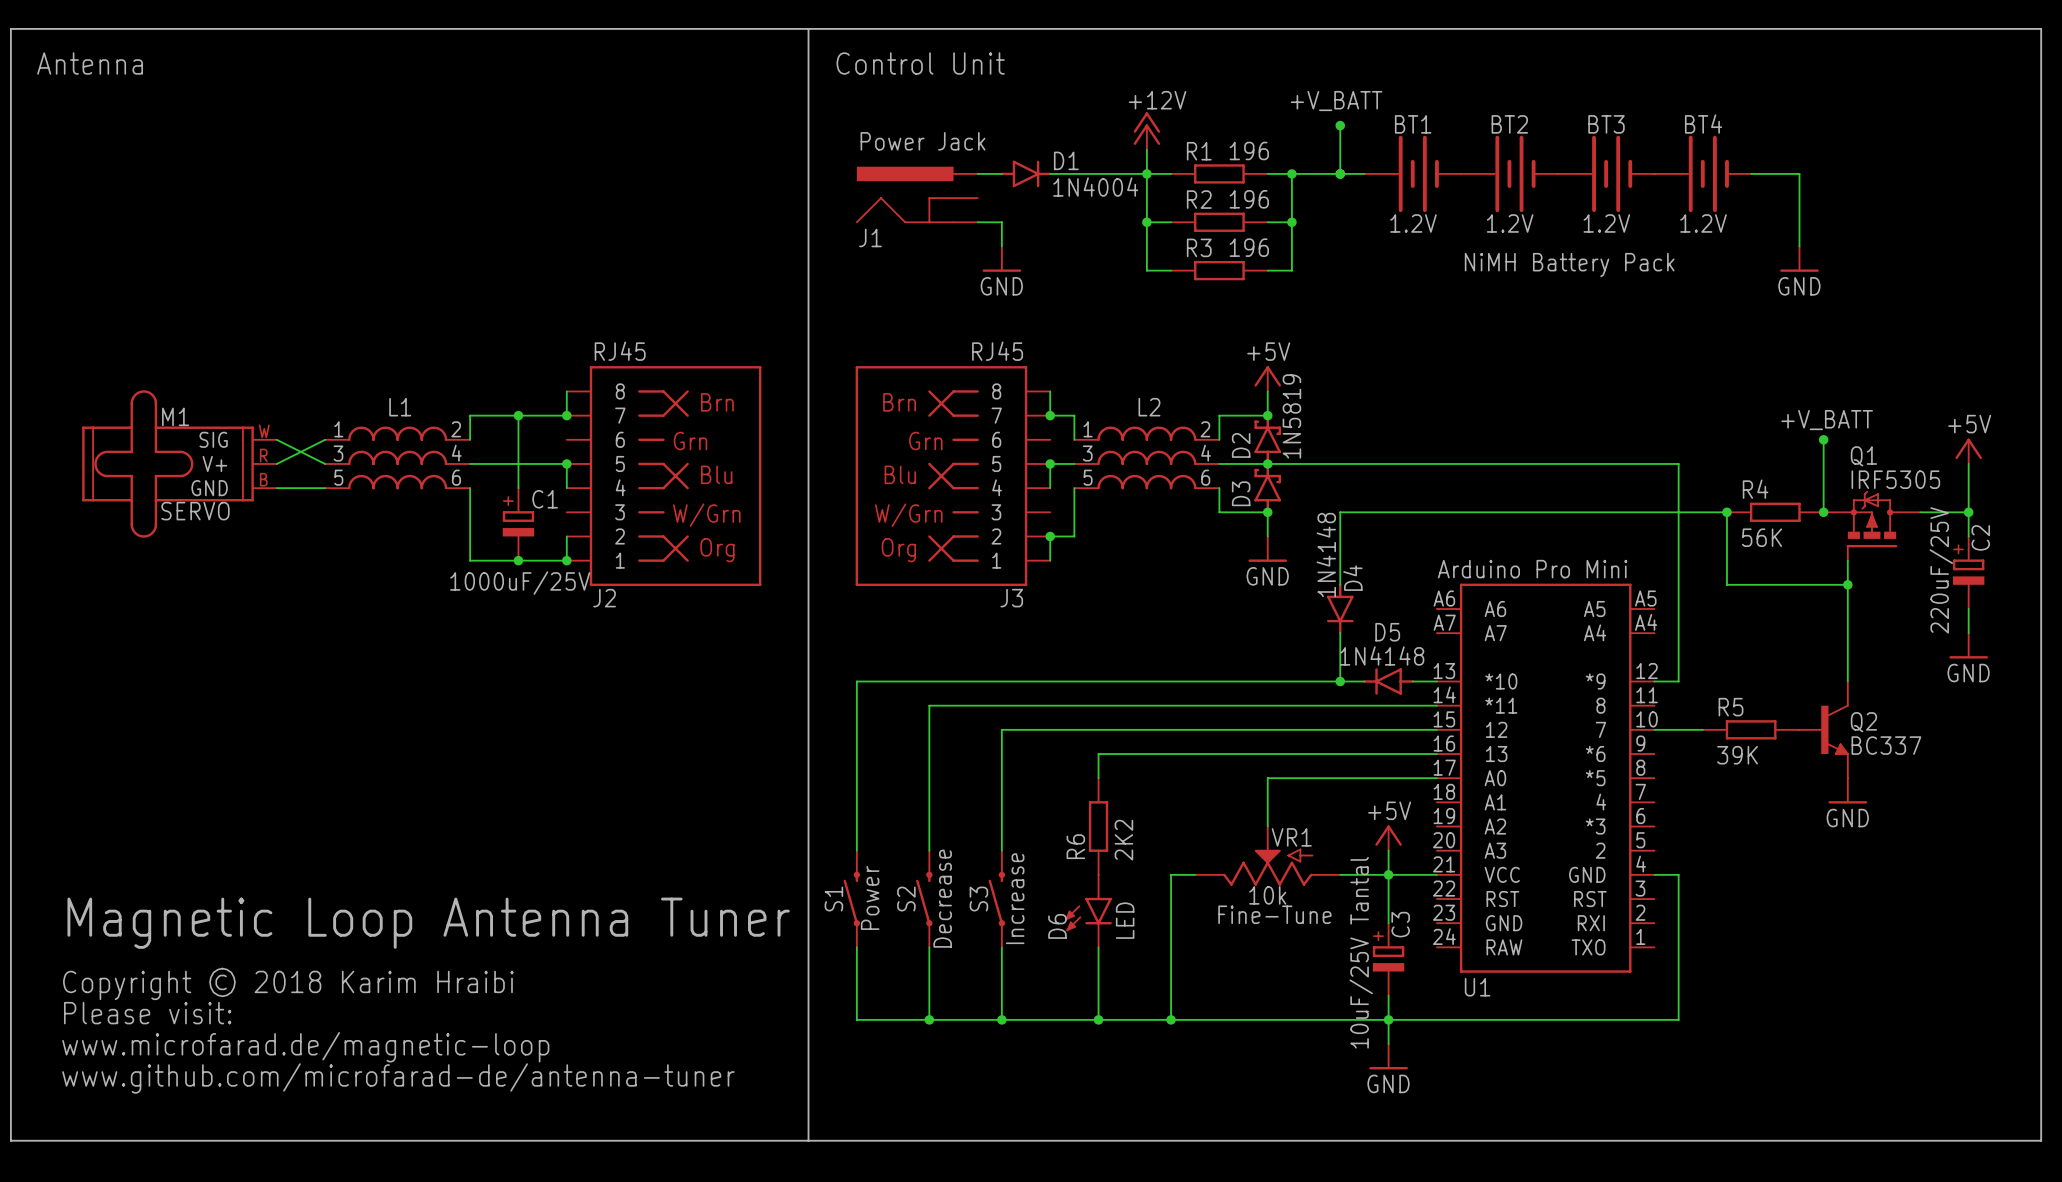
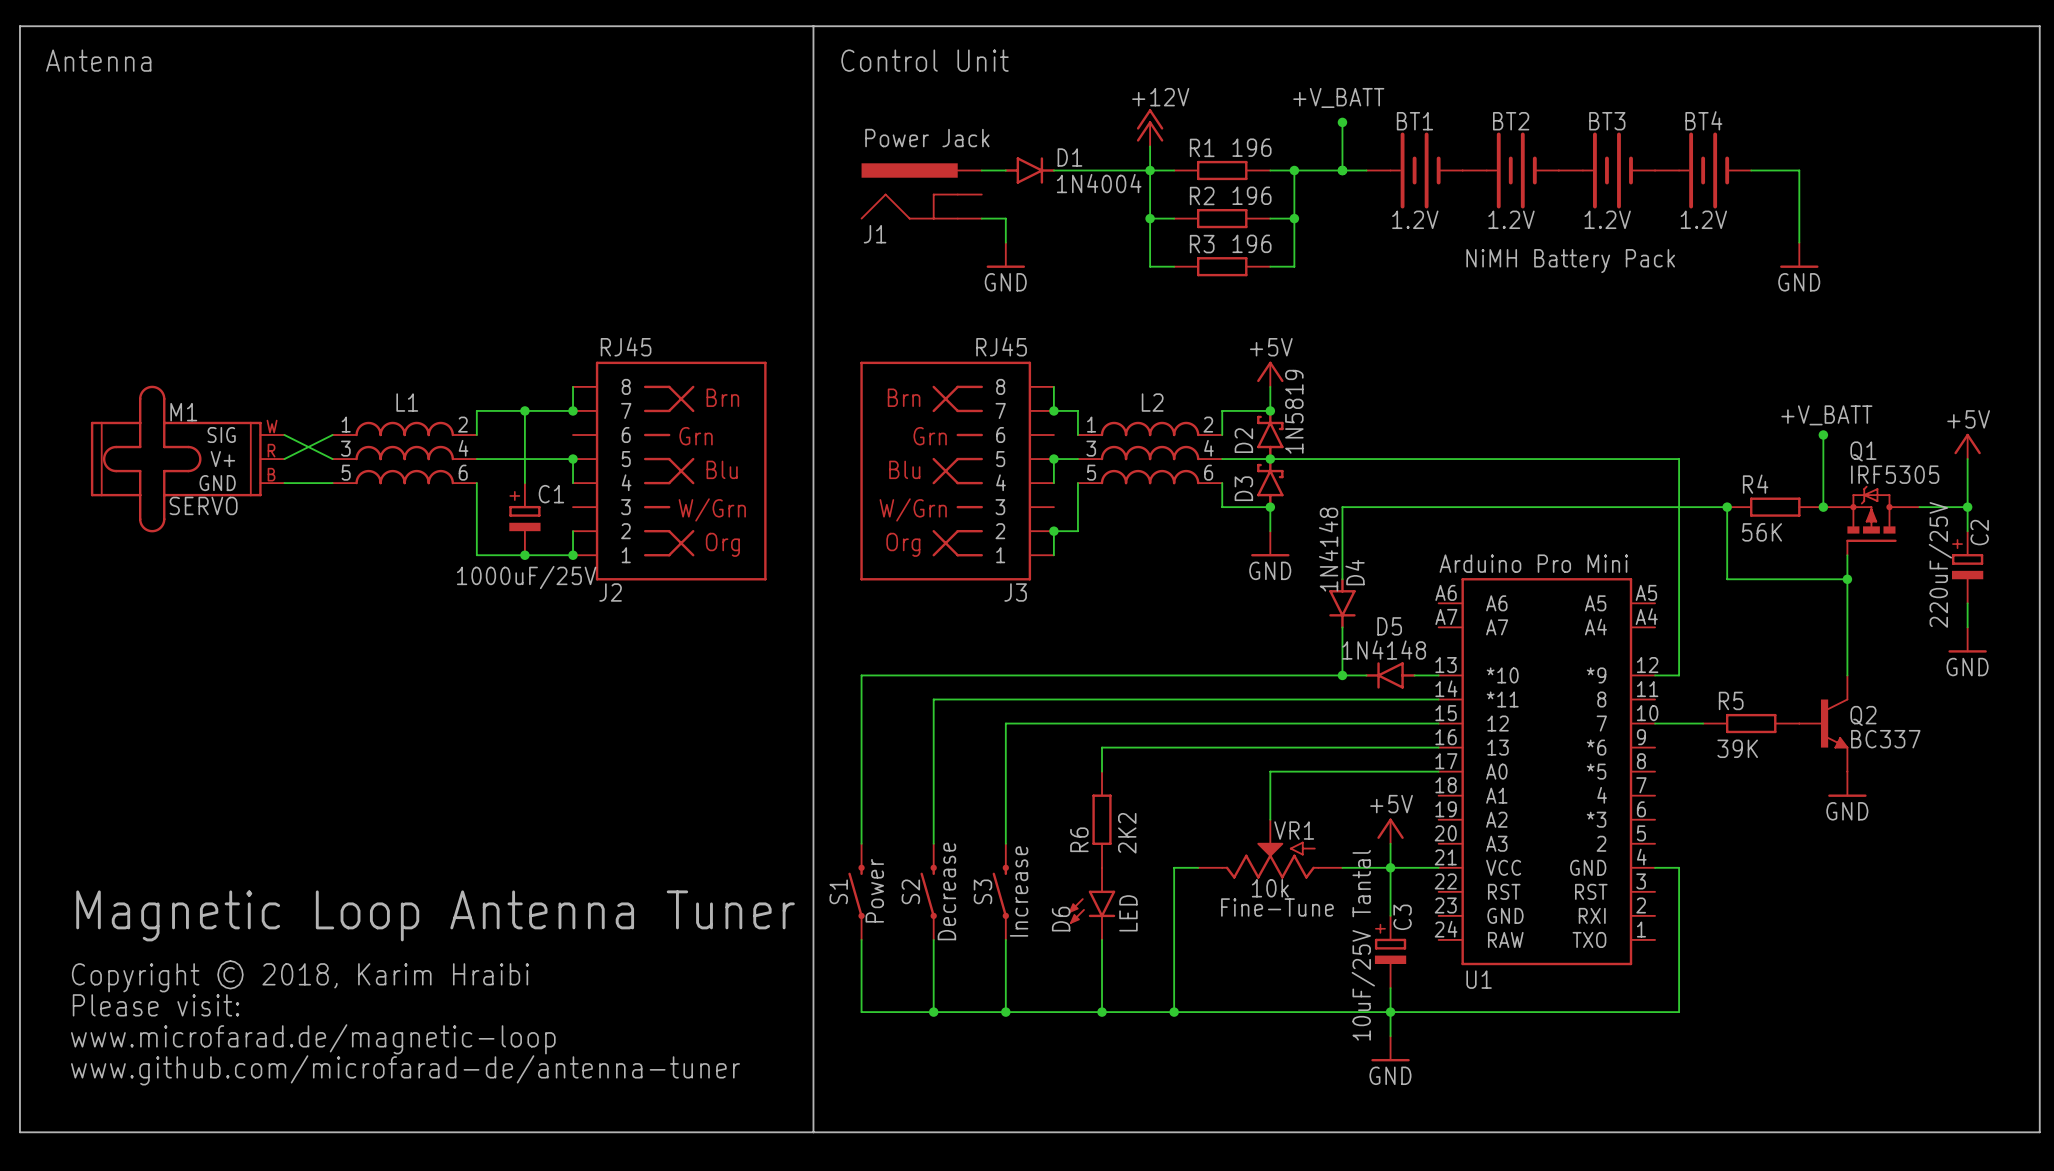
text: Copyright © 2018 Karim Hraibi (288, 983) -> Copyright © 2018, Karim Hraibi (300, 976)

